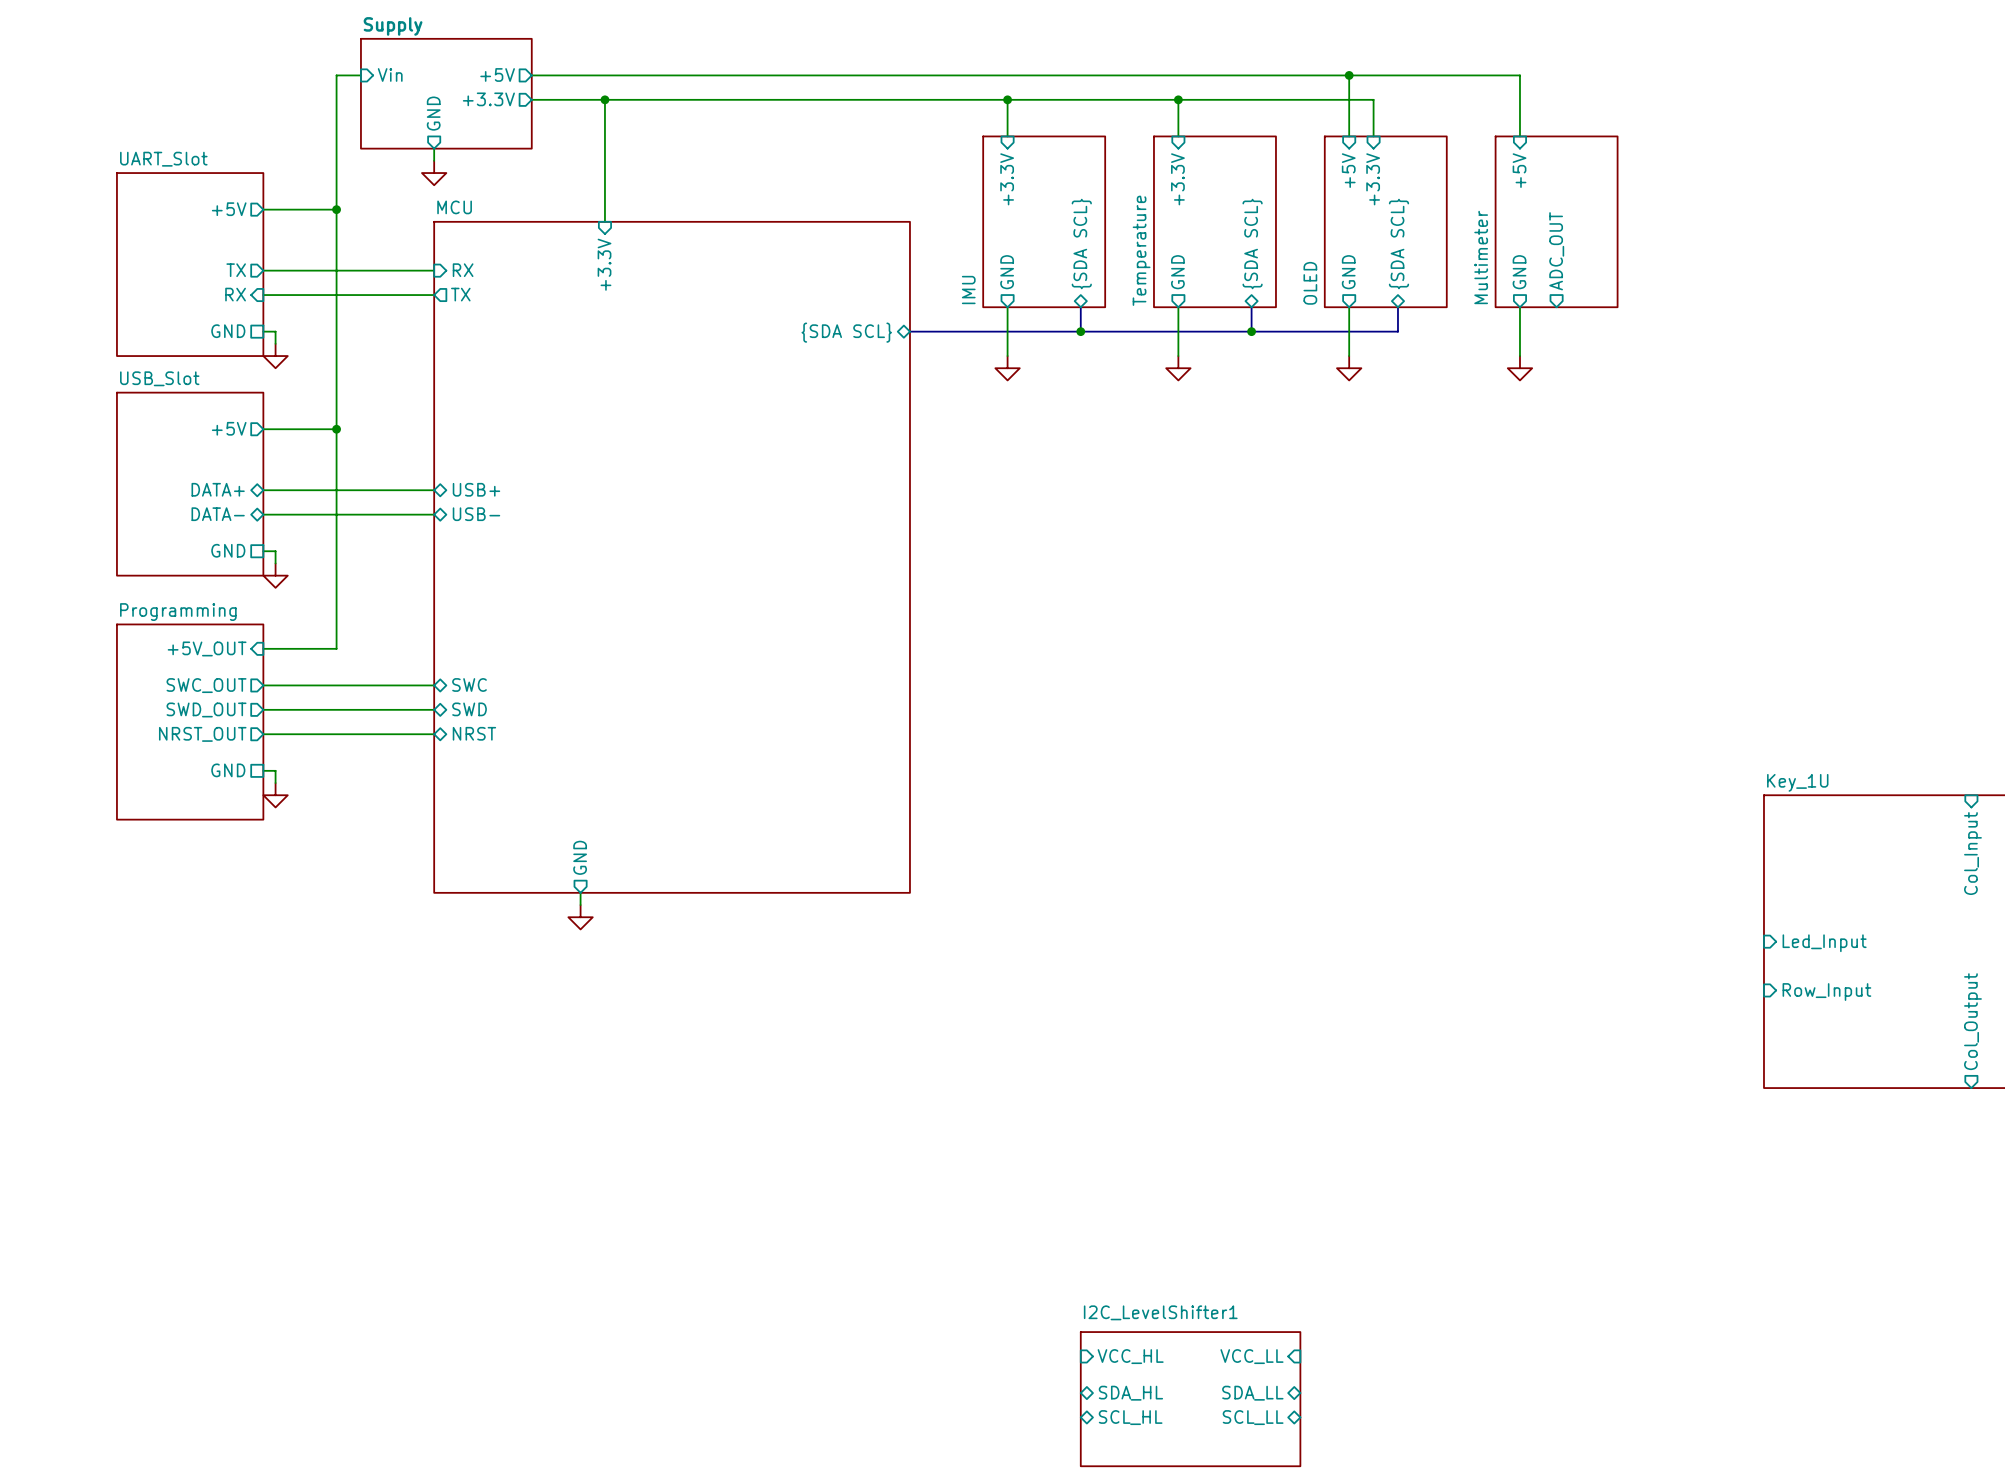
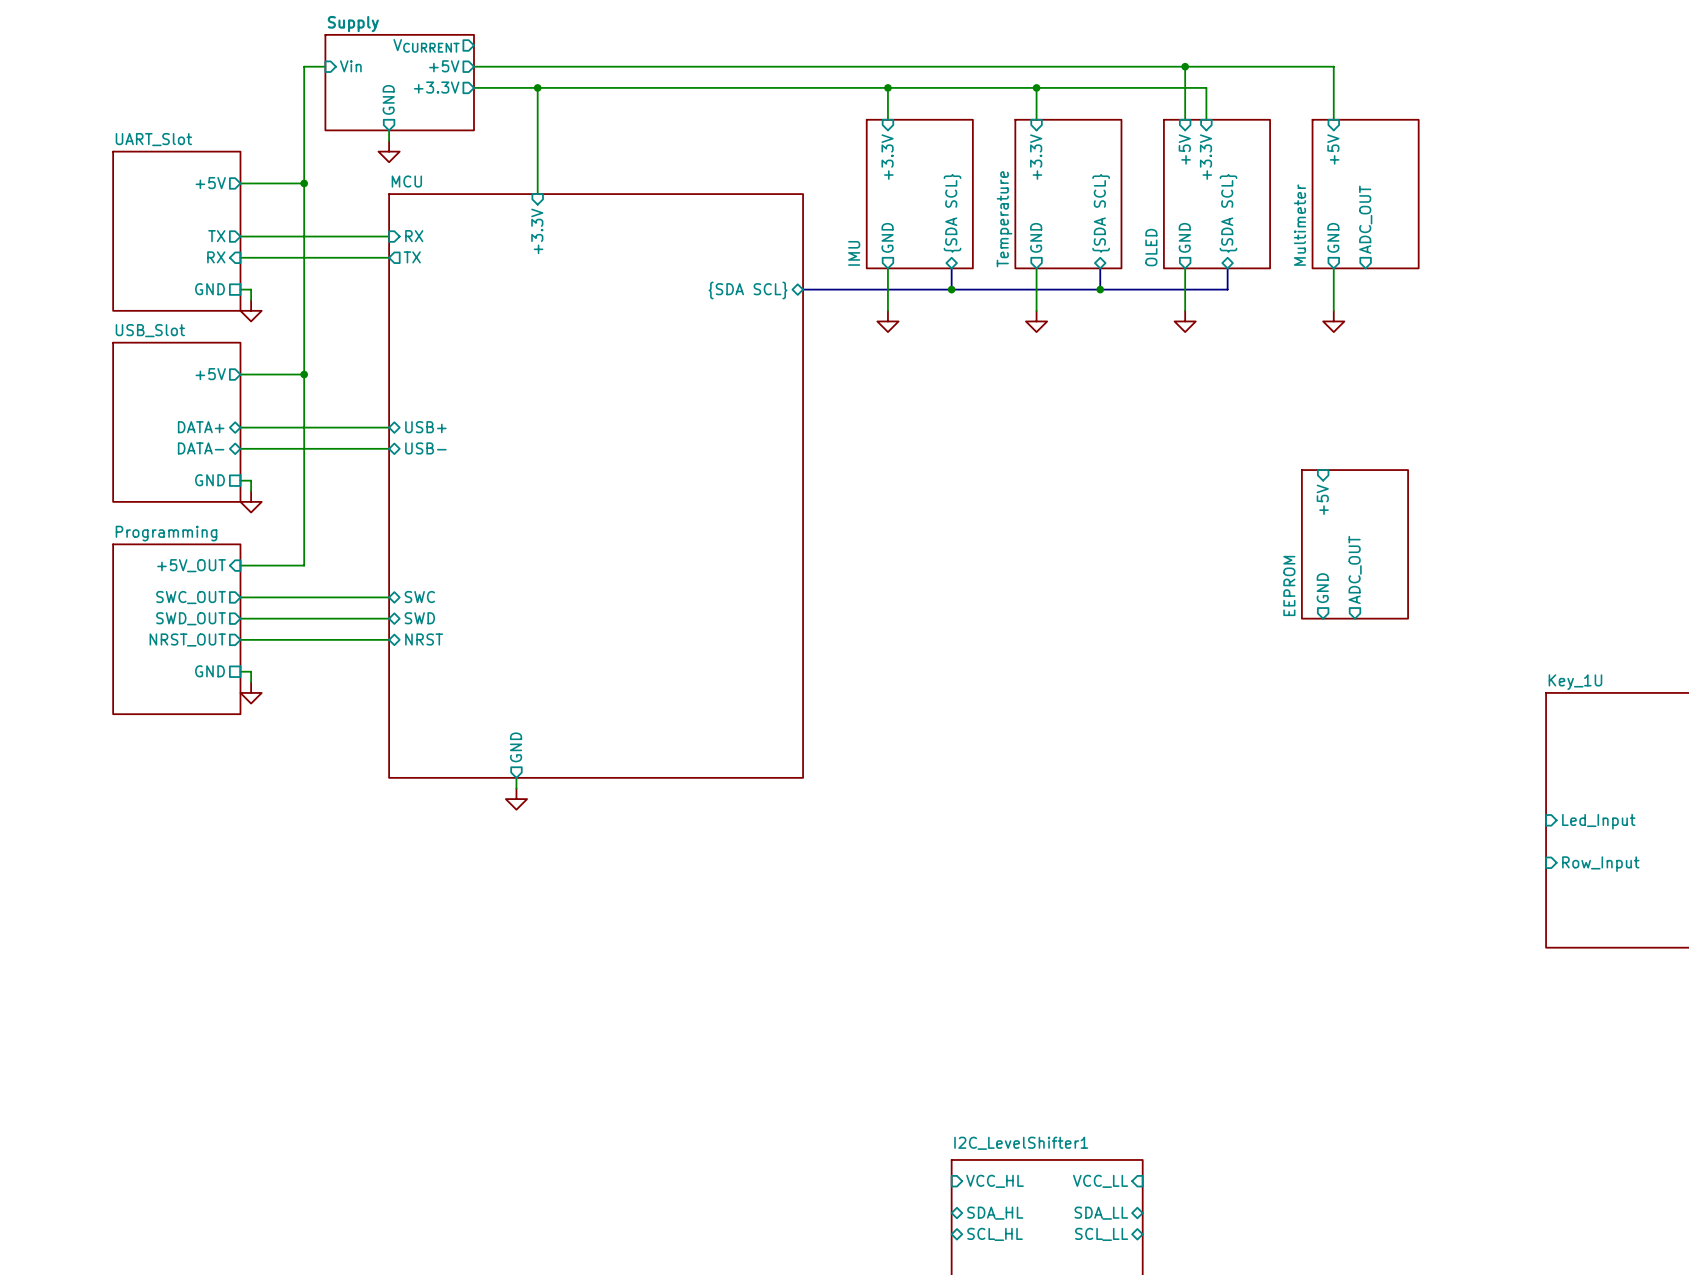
sheet pin: none -> VCURRENT (426, 45)
sheet pin: none -> +5V (1322, 499)
sheet EEPROM: none -> (1354, 544)
sheet pin: none -> ADC_OUT (1355, 569)
sheet pin: none -> GND (1322, 588)

